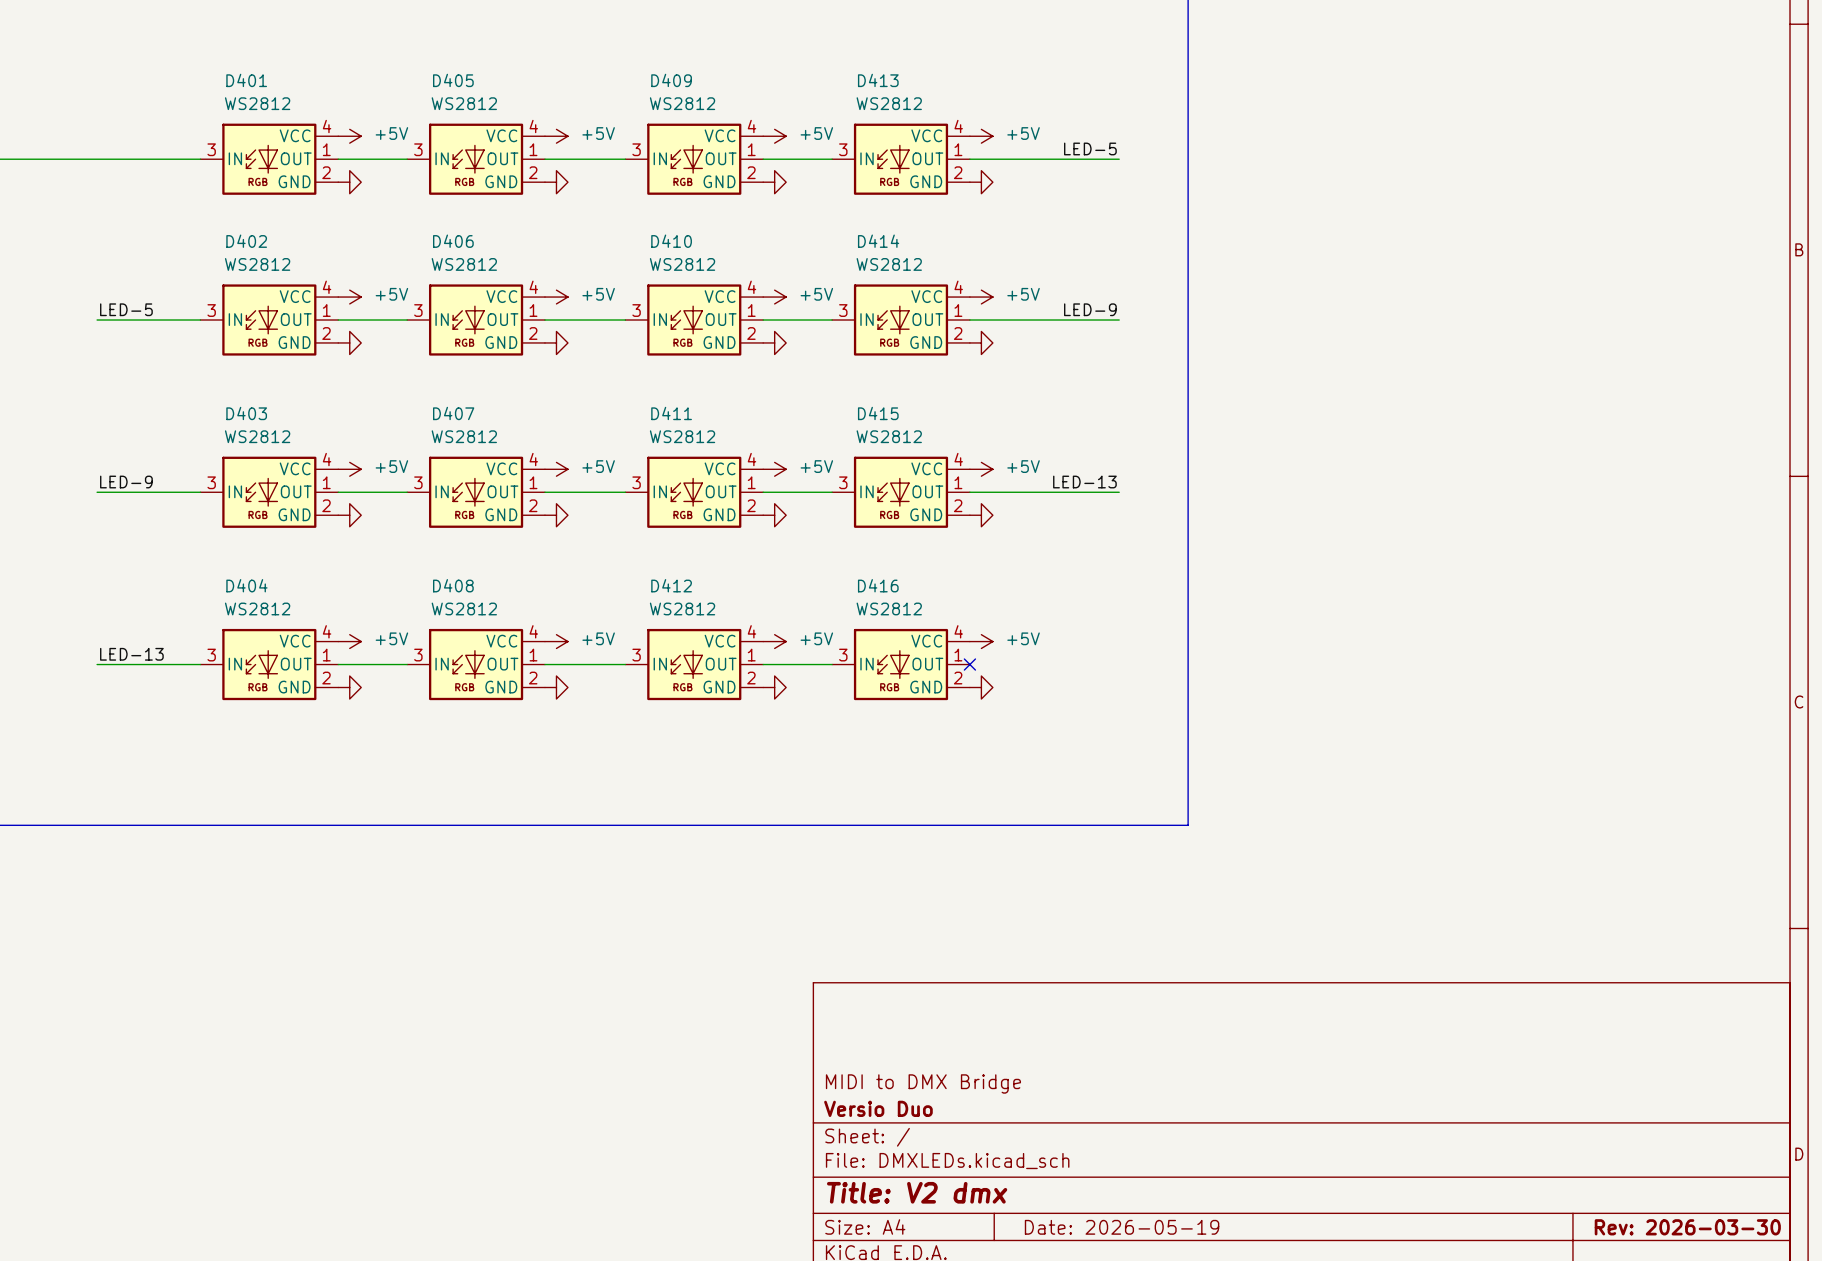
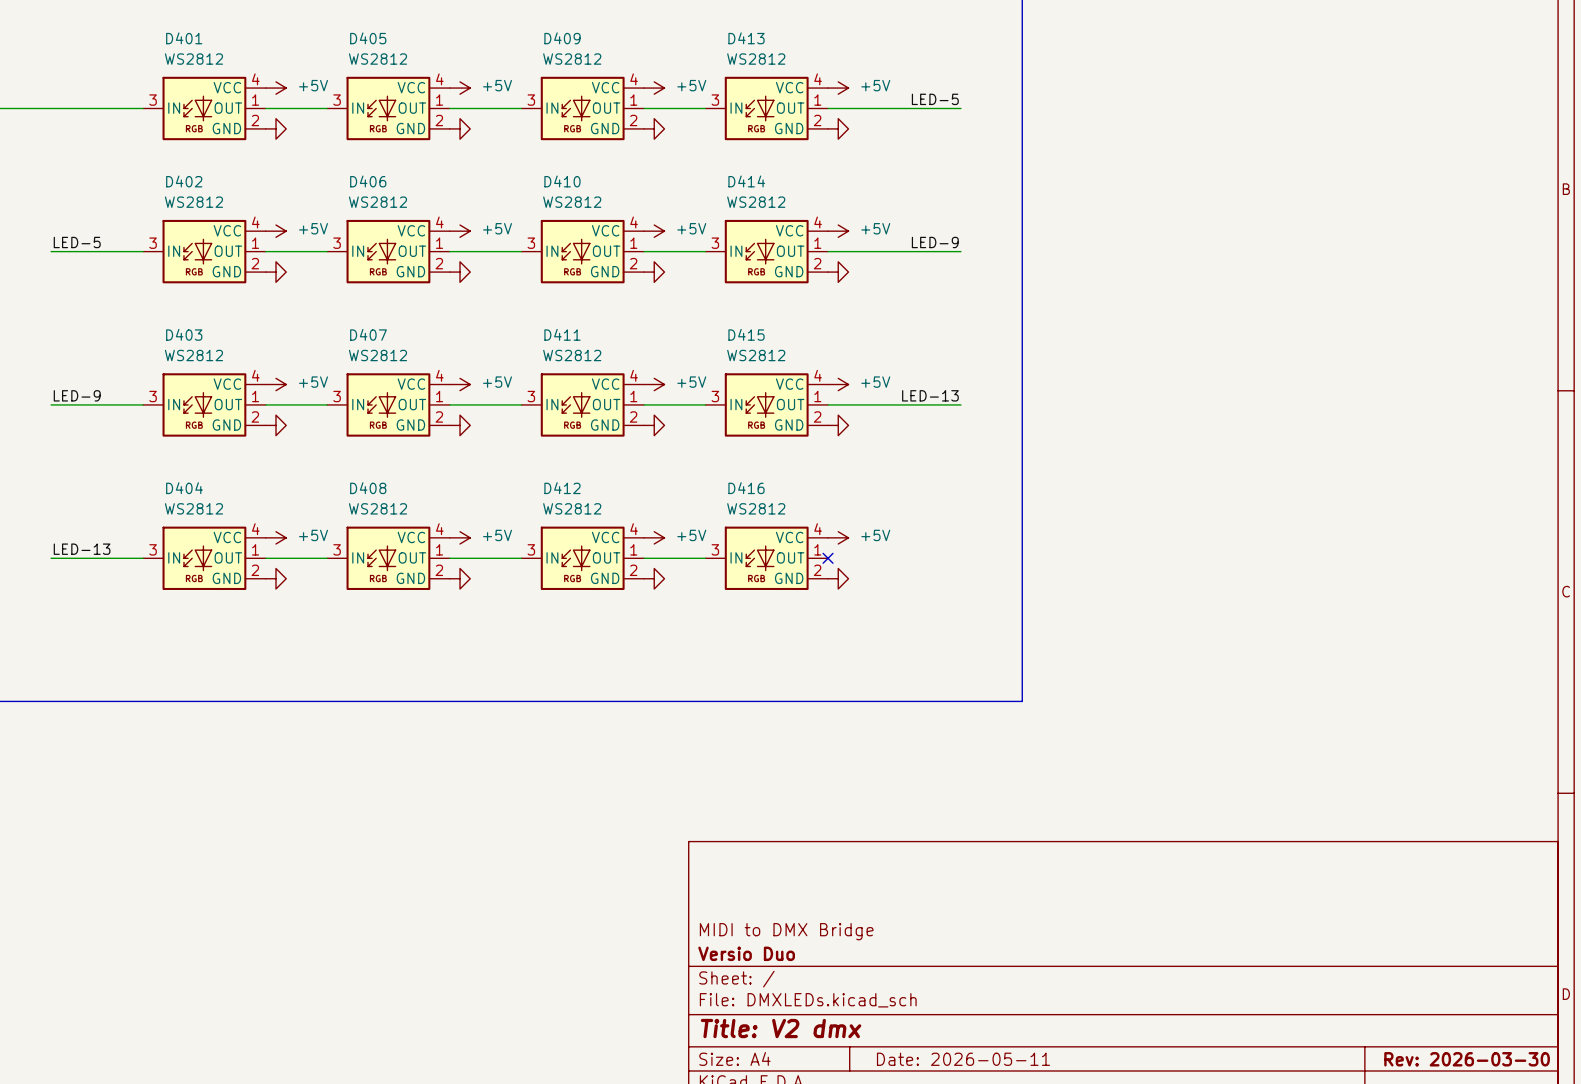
title block: Date: 2026-05-19 (1122, 1227) -> Date: 2026-05-11 (963, 1059)

